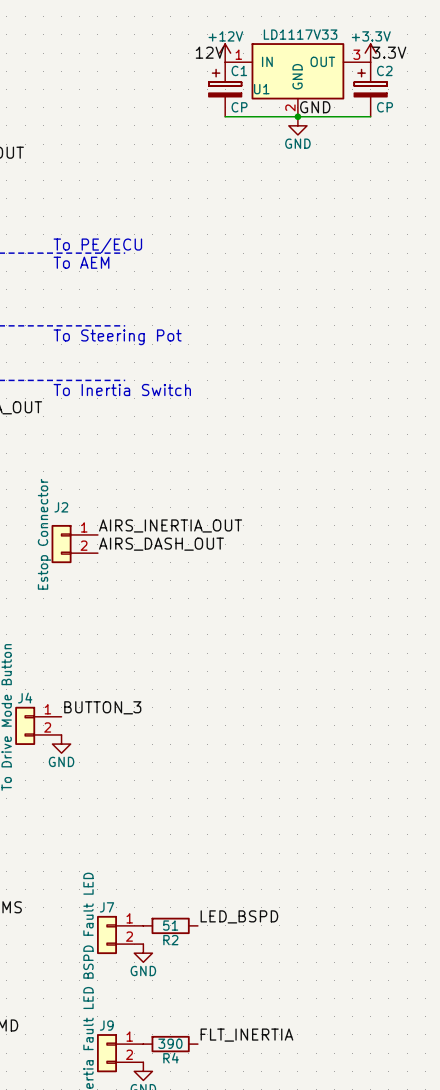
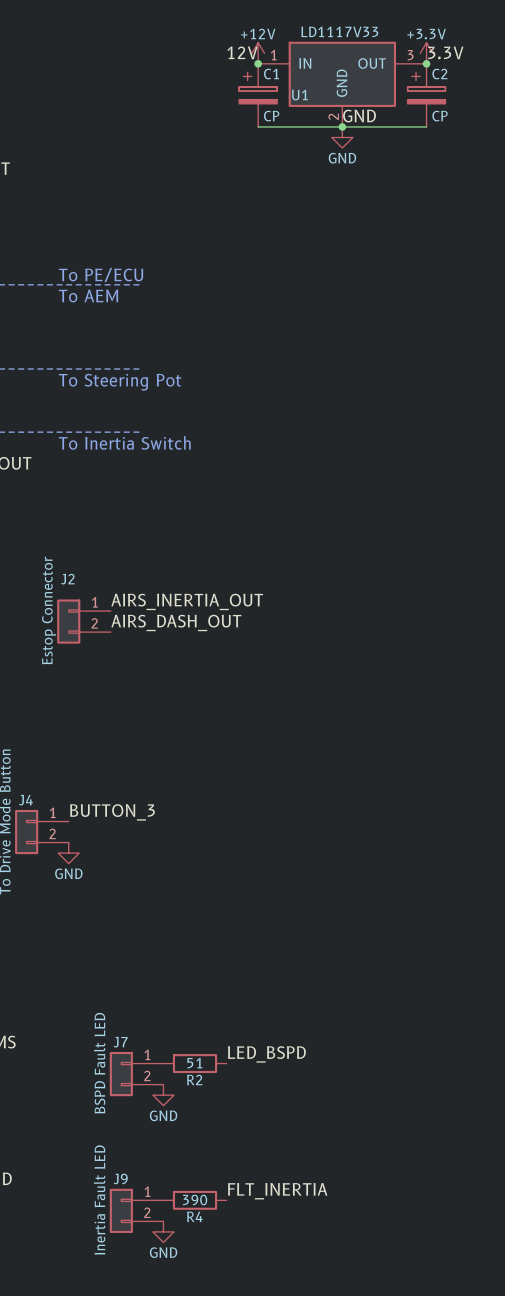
junction: none -> (258, 63)
junction: none -> (426, 63)

